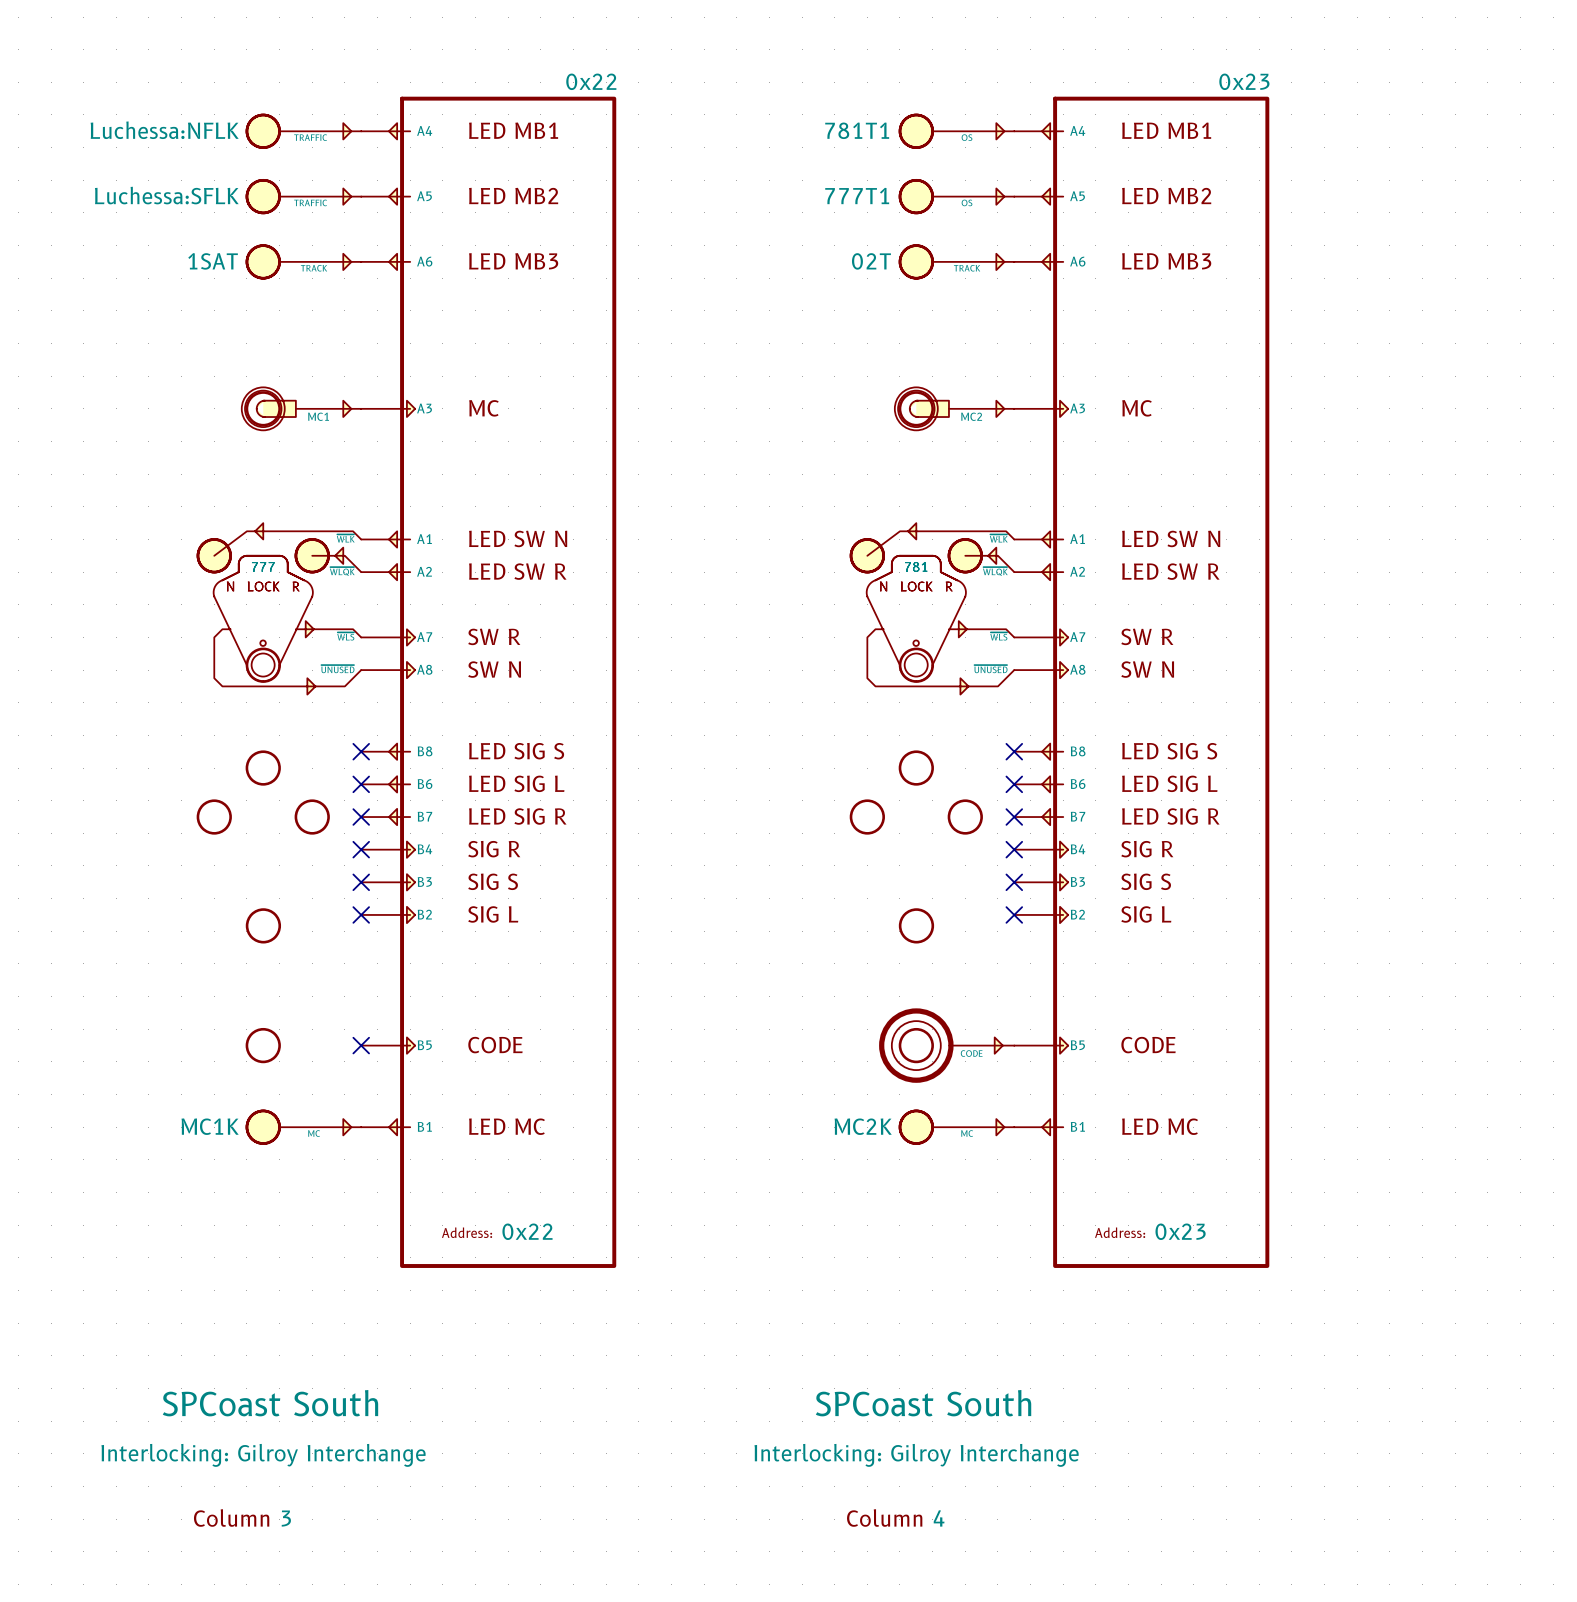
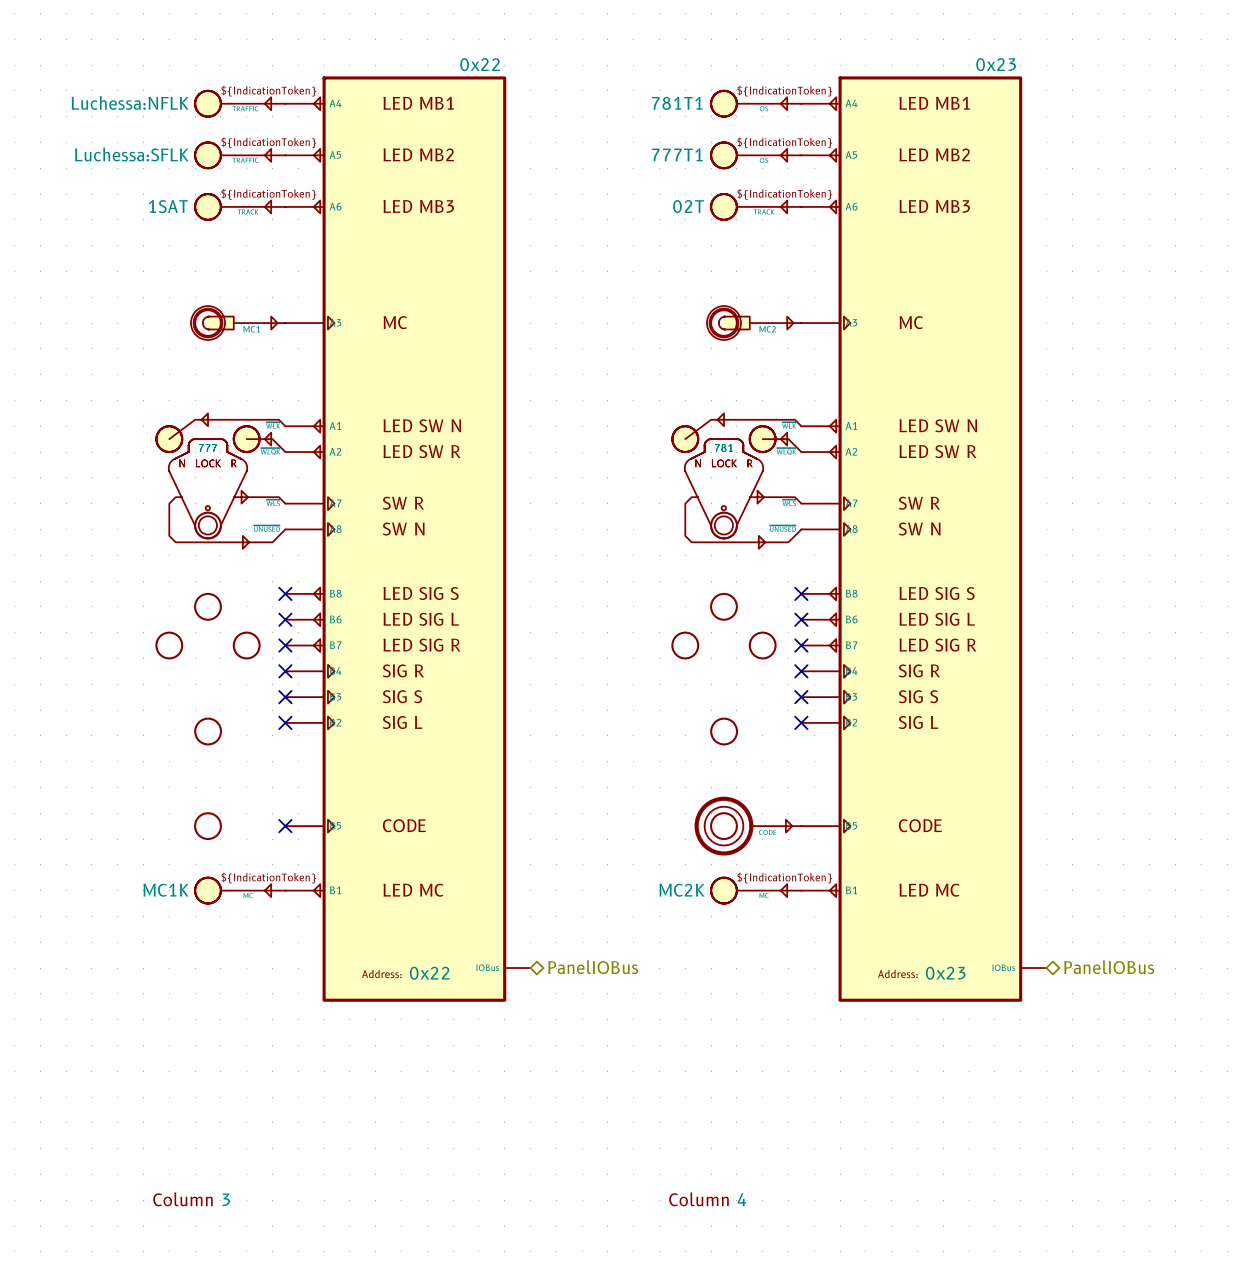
part symbol: [245, 113, 362, 149] -> [194, 89, 286, 118]
part symbol: [898, 113, 1015, 149] -> [710, 89, 802, 118]
part symbol: [245, 178, 362, 215] -> [194, 141, 286, 170]
part symbol: [898, 178, 1015, 215] -> [710, 141, 802, 170]
part symbol: [245, 244, 362, 280] -> [194, 193, 286, 221]
part symbol: [898, 244, 1015, 280] -> [710, 193, 802, 221]
part: 0x22 (488, 682) -> none
part: none -> 0x22 (407, 539)
part: 0x23 (1141, 682) -> none
part: none -> 0x23 (923, 539)
part symbol: [245, 1109, 362, 1145] -> [194, 876, 286, 905]
part symbol: [898, 1109, 1015, 1145] -> [710, 876, 802, 905]
hierarchical label: none -> PanelIOBus (593, 967)
hierarchical label: none -> PanelIOBus (1109, 967)
part text: SPCoast South (270, 1403) -> none
part text: SPCoast South (923, 1403) -> none
part text: Interlocking: Gilroy Interchange (263, 1455) -> none
part text: Interlocking: Gilroy Interchange (916, 1455) -> none

